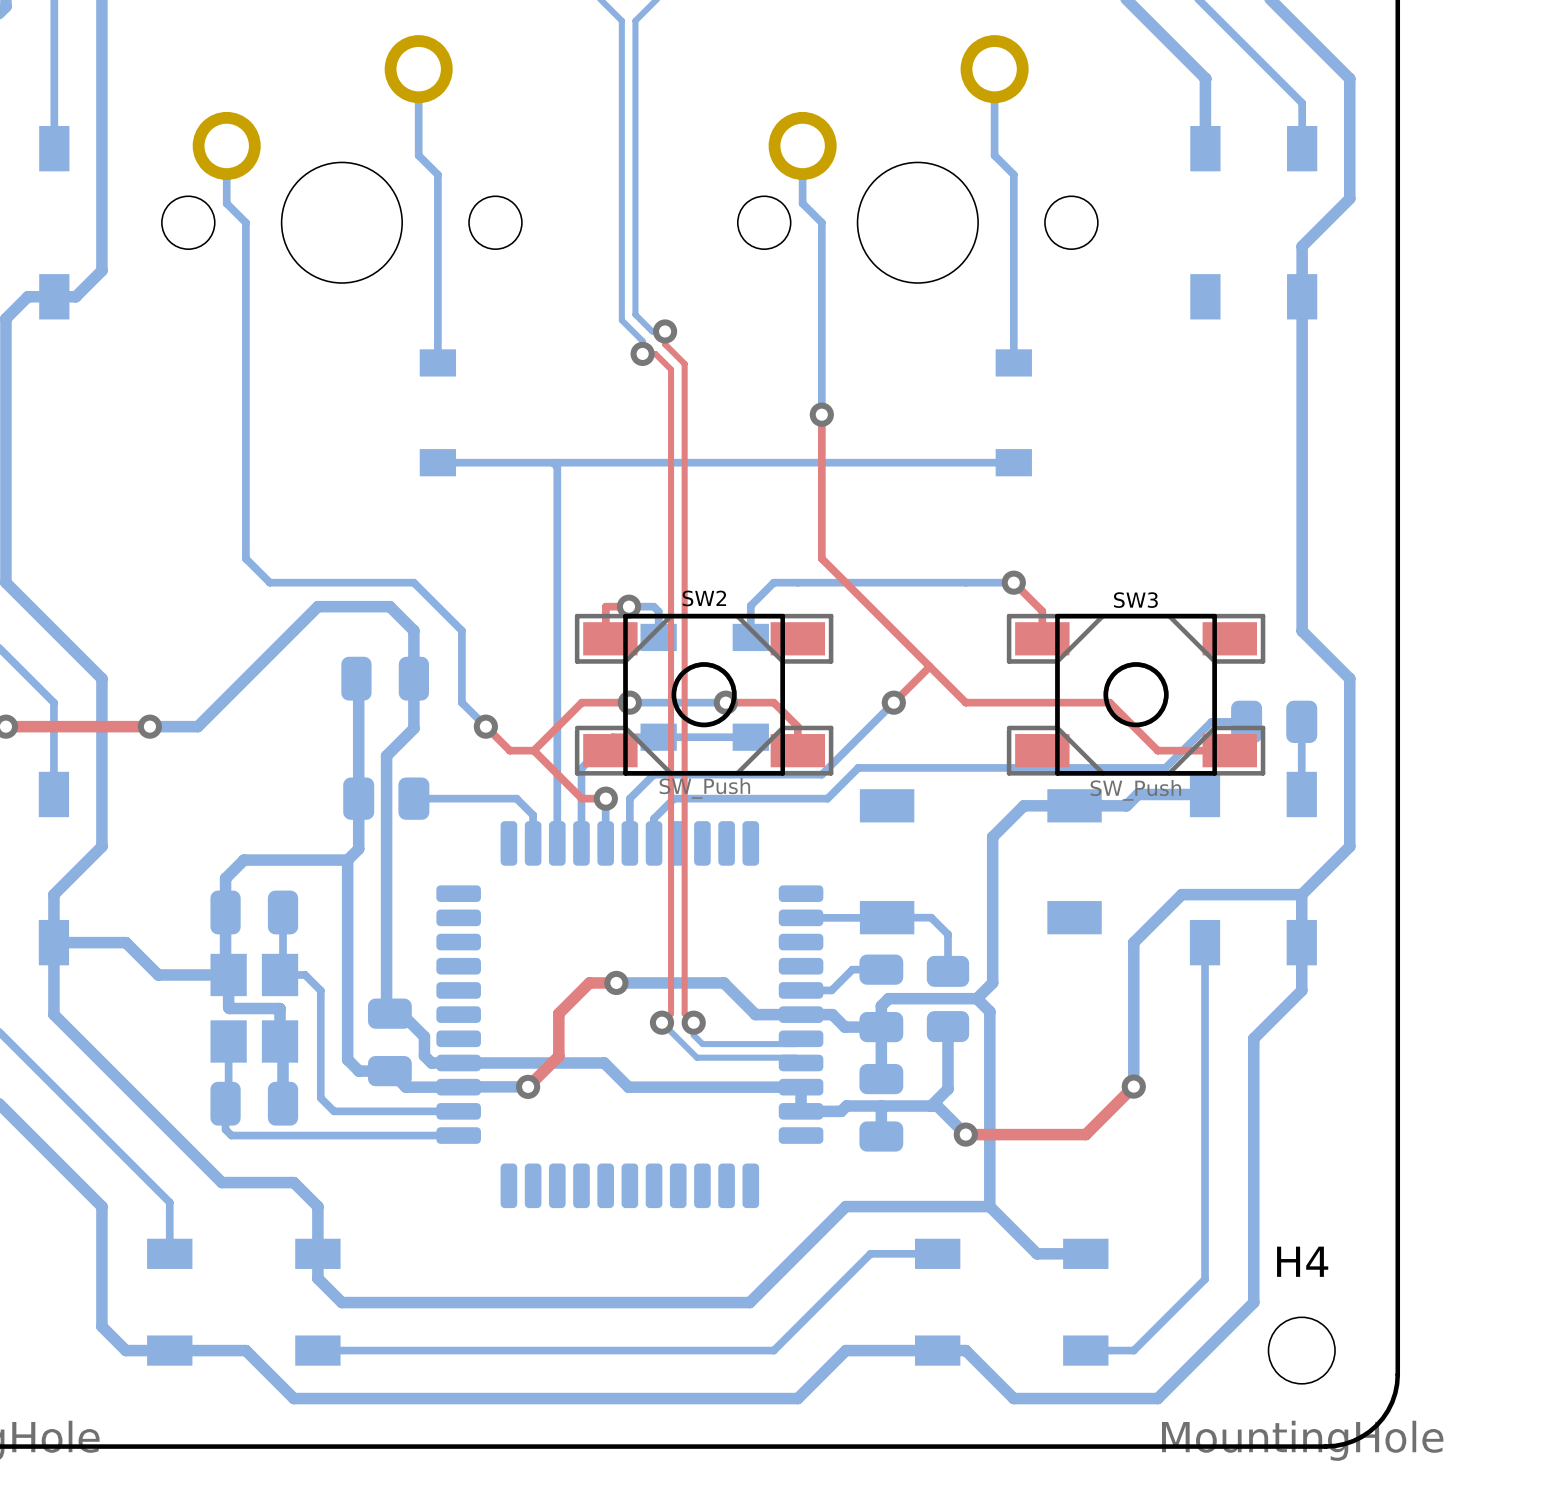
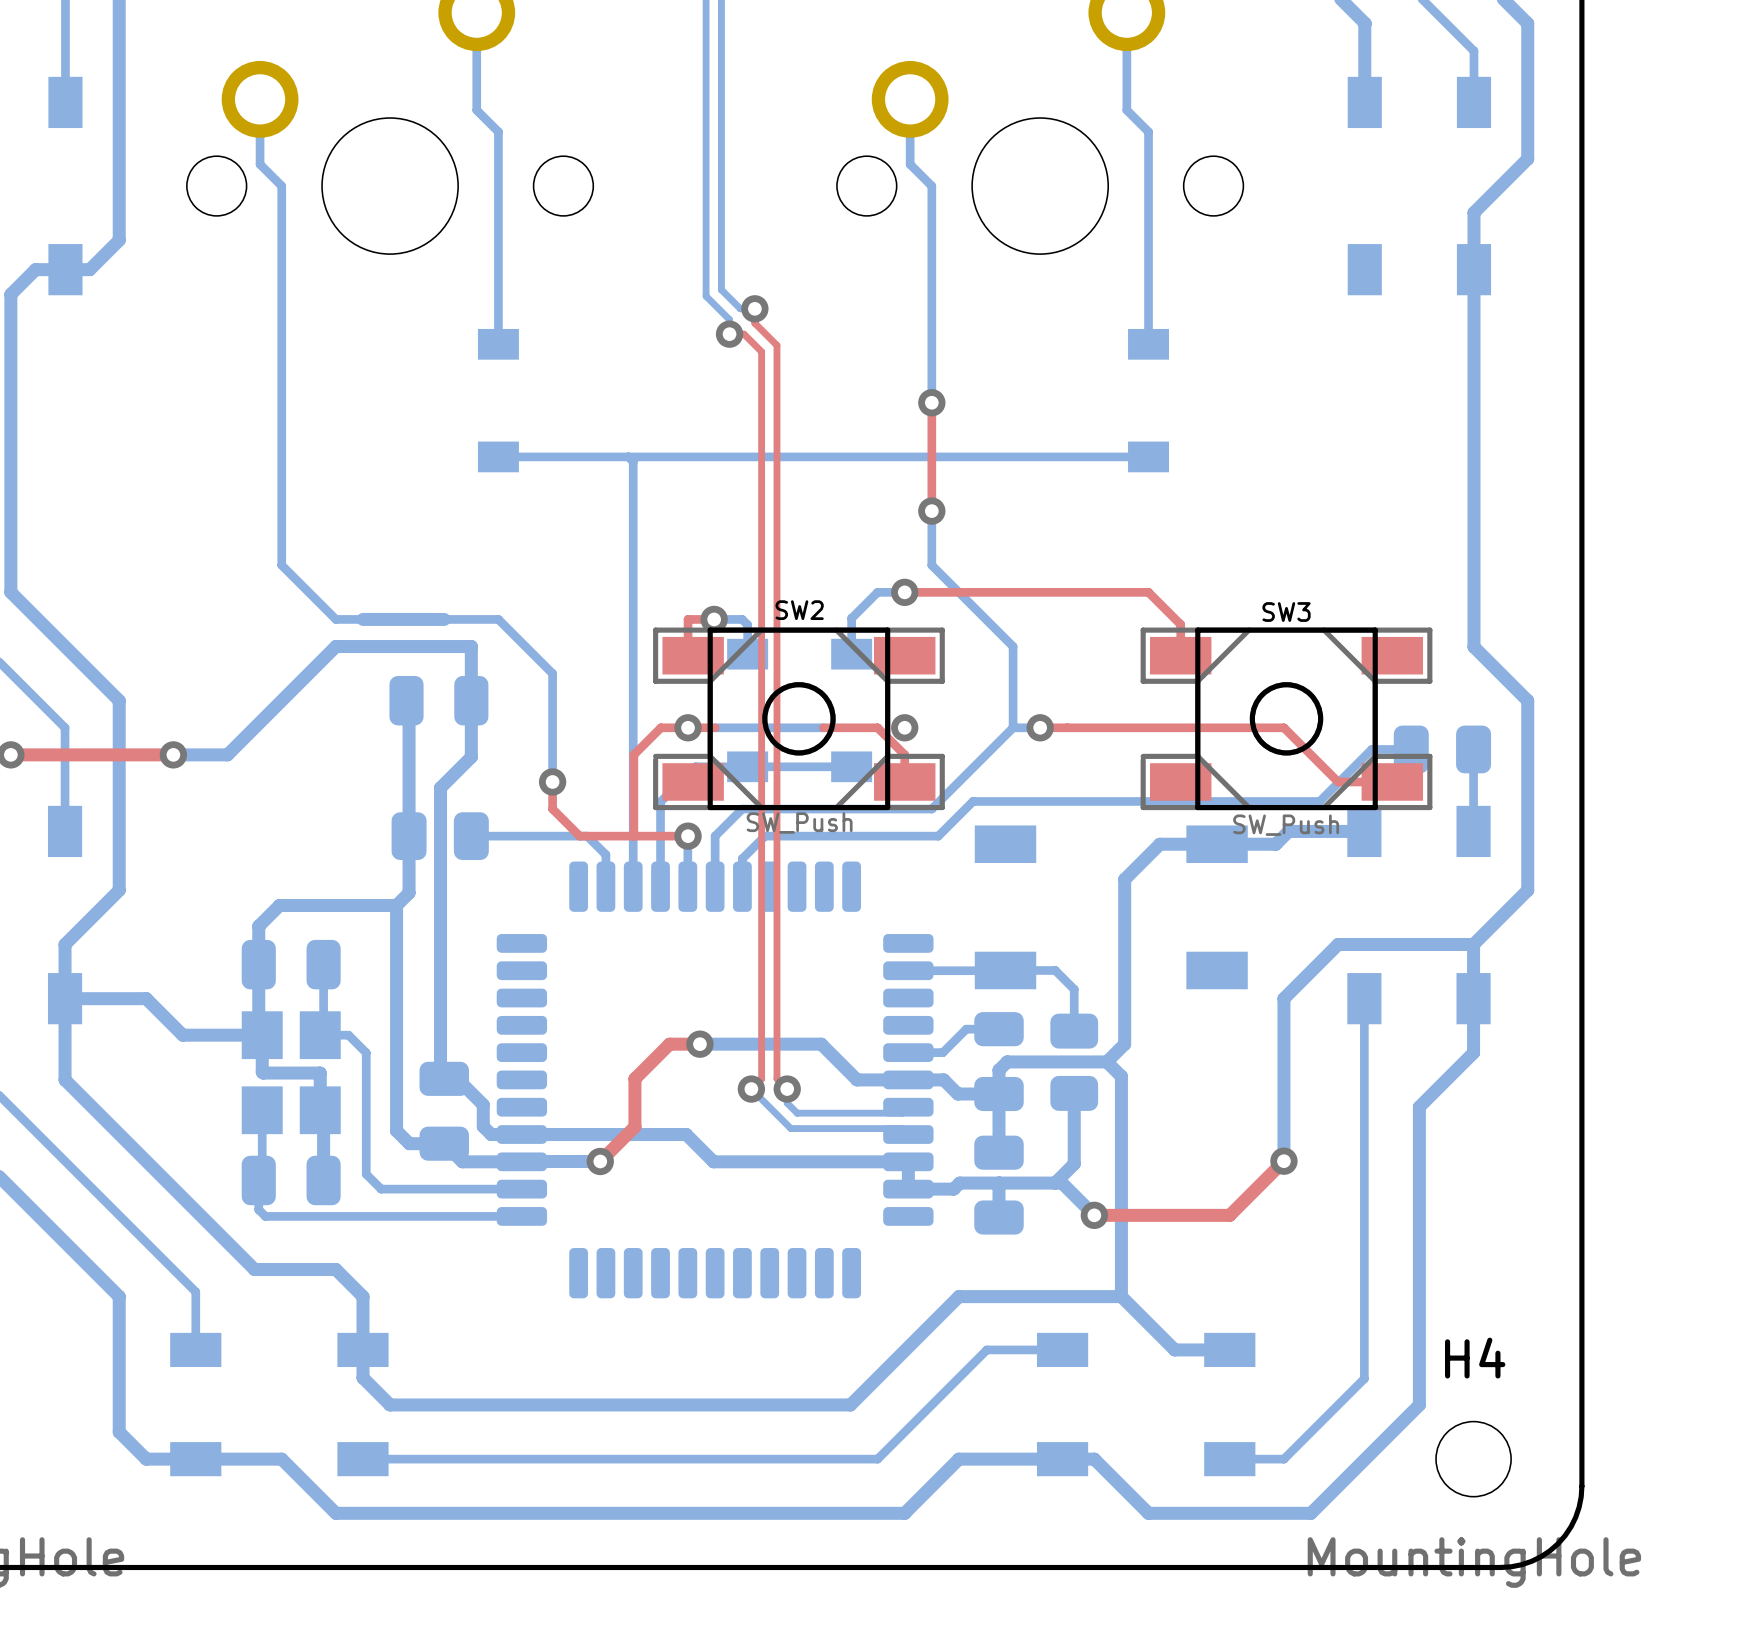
bottom track: none -> (931, 511) (931, 565) (1013, 646) (1013, 727) (1040, 727)
top track: (821, 510) (821, 558) (965, 702) -> (1040, 727) (1094, 727)
via: none -> (931, 511)
bottom track: (269, 582) (413, 582) (437, 606) -> none
bottom track: (797, 582) (1013, 582) -> none
top track: none -> (904, 592) (1148, 592)
via: none -> (904, 592)
via: (1013, 582) -> none
bottom track: (317, 606) (293, 630) -> (362, 619) (335, 619) (308, 592)
bottom track: (389, 606) (413, 630) -> (444, 619) (498, 619)
bottom track: none -> (335, 646) (471, 646)
bottom track: (461, 630) (461, 702) (485, 726) -> (525, 646) (552, 673) (552, 781)
top track: (929, 666) (893, 702) -> none
via position: (629, 702) -> (688, 727)
via: (725, 702) -> none
via: none -> (904, 727)
via position: (893, 702) -> (1040, 727)
top track: (1109, 702) (1157, 750) (1181, 750) -> (1256, 727) (1283, 727) (1338, 781)
top track: (485, 726) (509, 750) (533, 750) -> none
via position: (485, 726) -> (552, 781)
top track: (557, 726) (533, 750) -> (633, 754) (633, 836)
top track: (533, 750) (581, 798) -> (552, 781) (552, 809) (579, 836) (660, 836)

